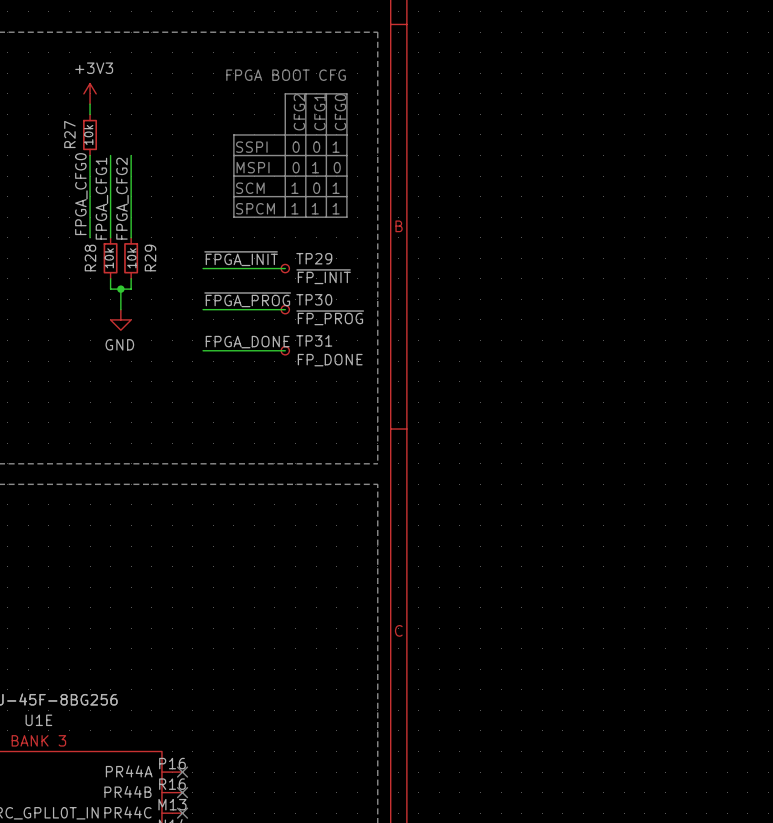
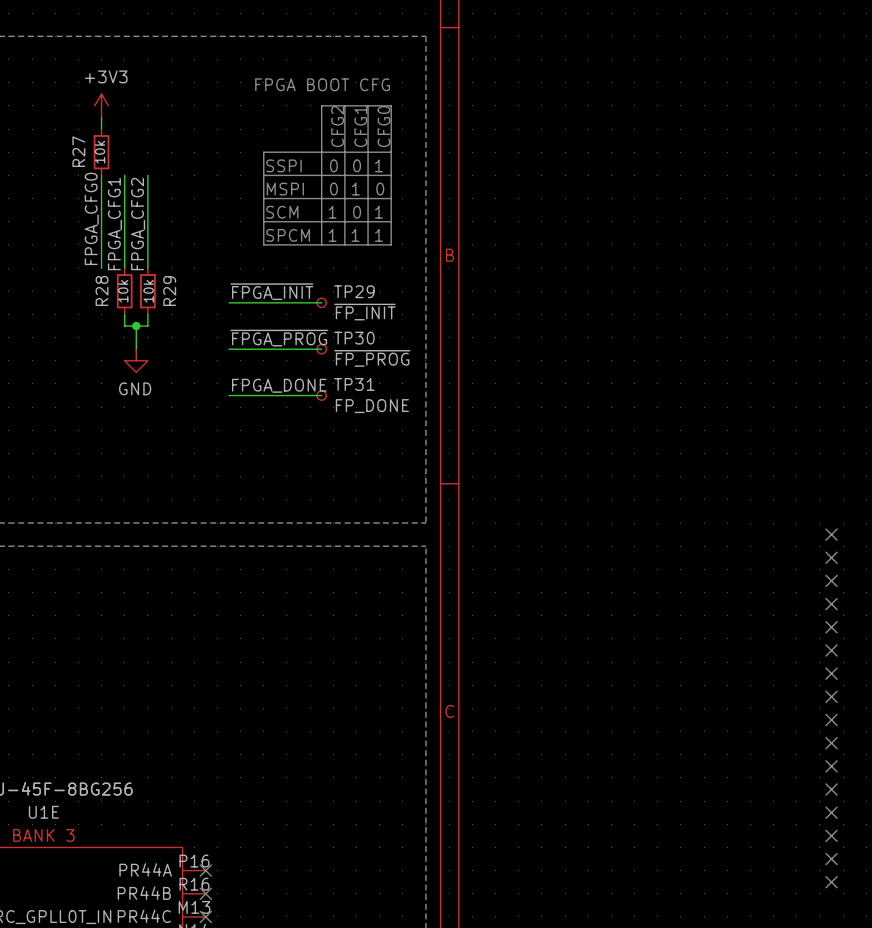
no-connect mark: none -> (831, 534)
no-connect mark: none -> (831, 557)
no-connect mark: none -> (831, 580)
no-connect mark: none -> (831, 604)
no-connect mark: none -> (831, 627)
no-connect mark: none -> (831, 650)
no-connect mark: none -> (831, 673)
no-connect mark: none -> (831, 696)
no-connect mark: none -> (831, 719)
no-connect mark: none -> (831, 743)
no-connect mark: none -> (831, 766)
no-connect mark: none -> (831, 789)
no-connect mark: none -> (831, 812)
no-connect mark: none -> (831, 835)
no-connect mark: none -> (831, 859)
no-connect mark: none -> (831, 882)

